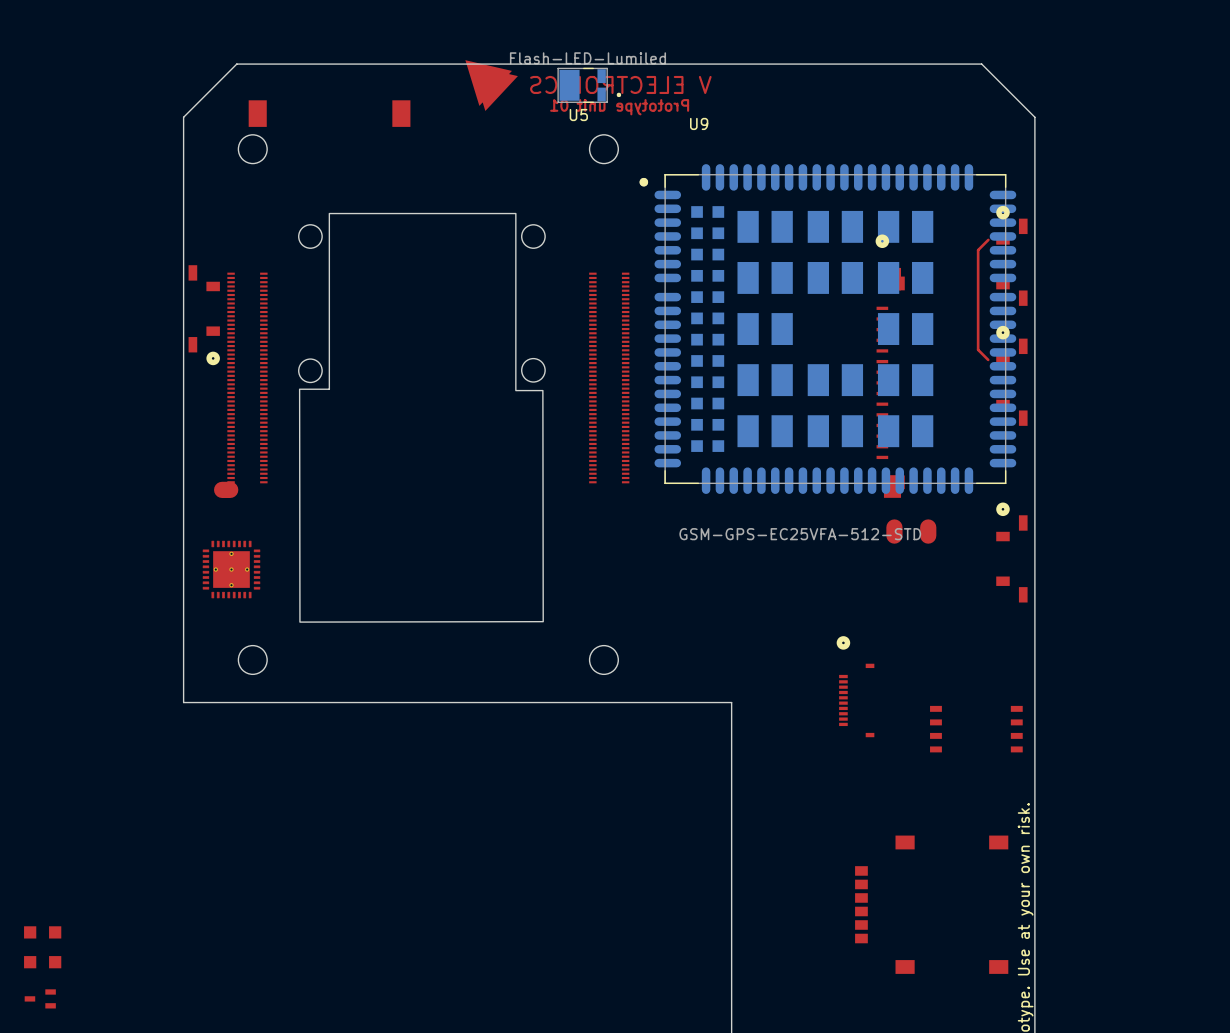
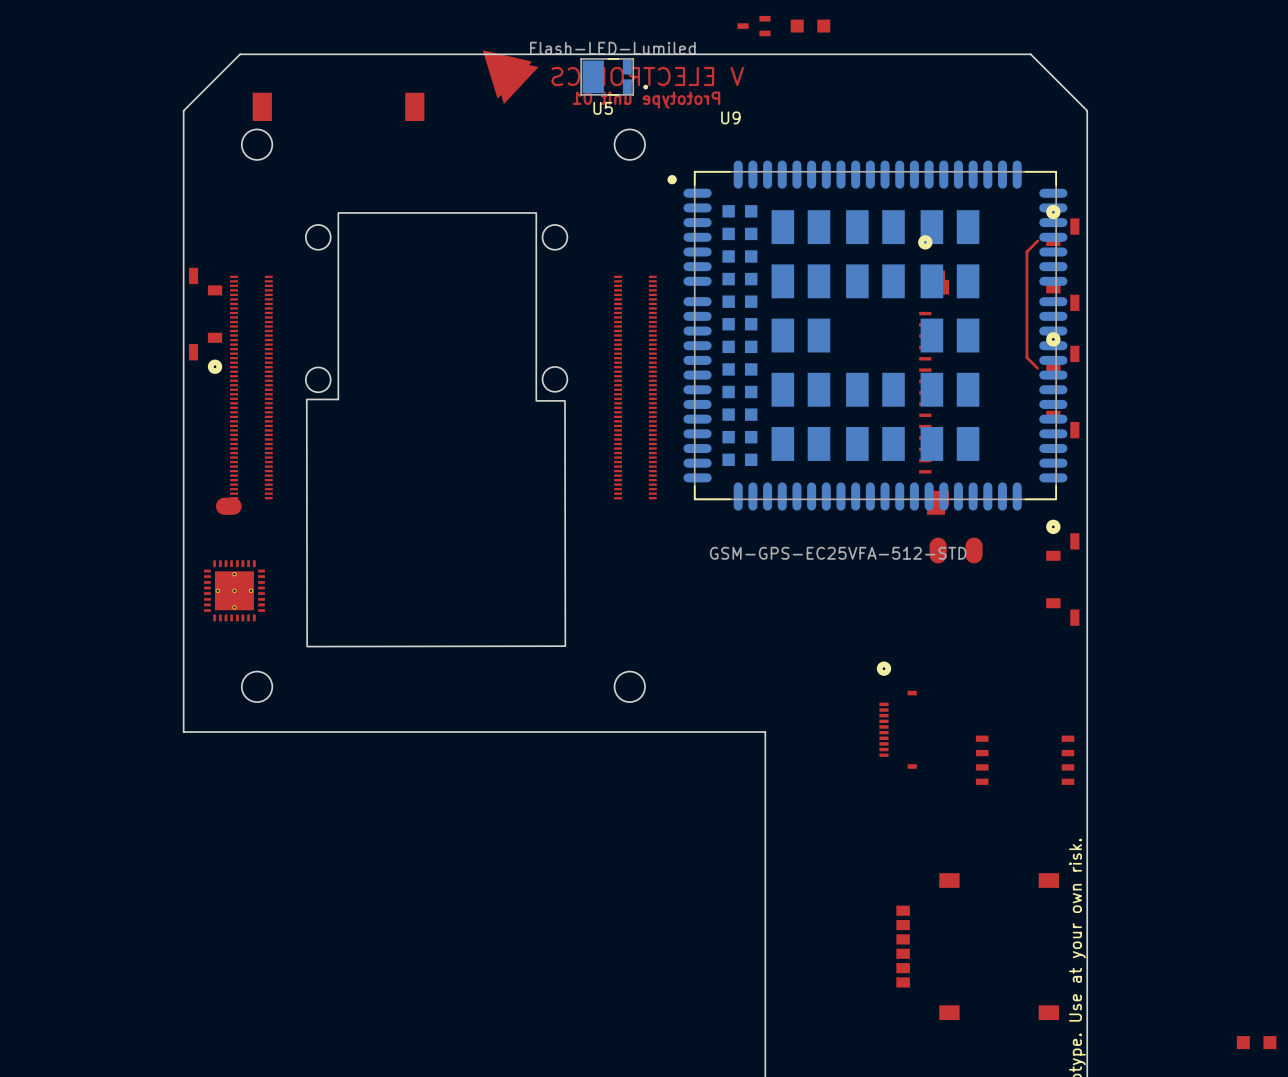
part: none -> (754, 26)
part: none -> (810, 26)
part: (42, 932) -> none
part: (42, 962) -> none
part: none -> (1256, 1042)
part: (40, 998) -> none

